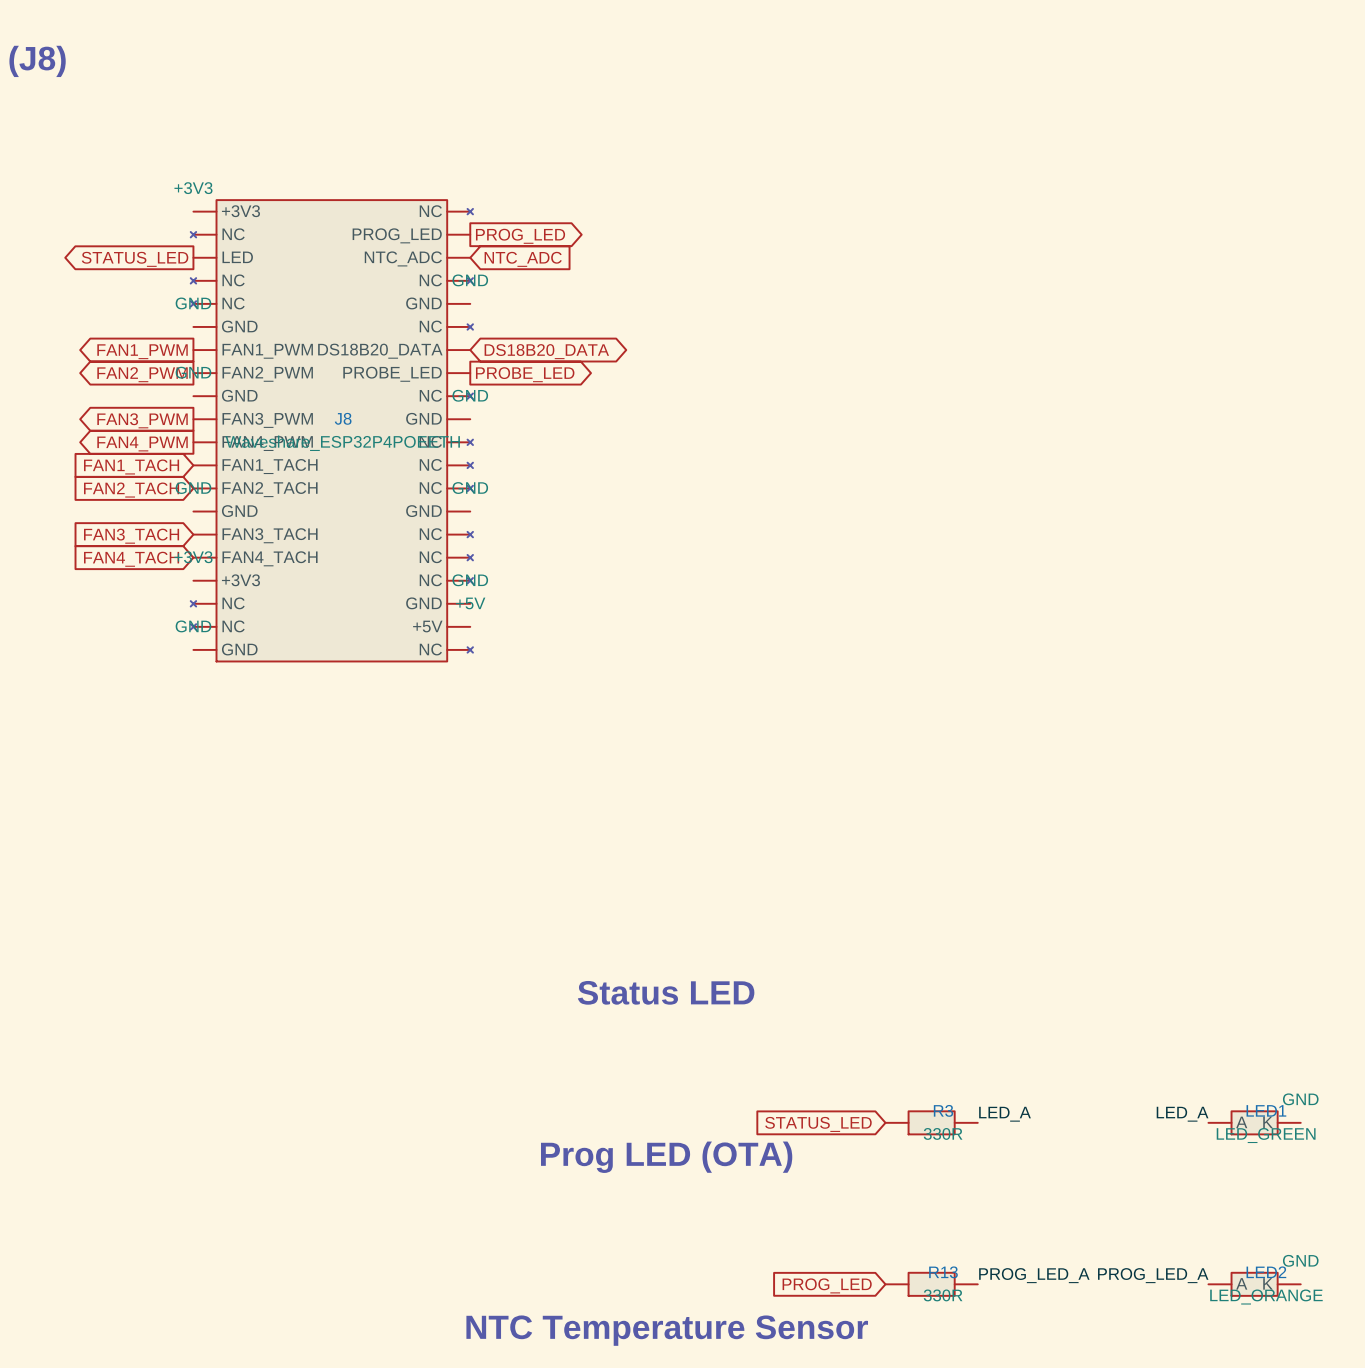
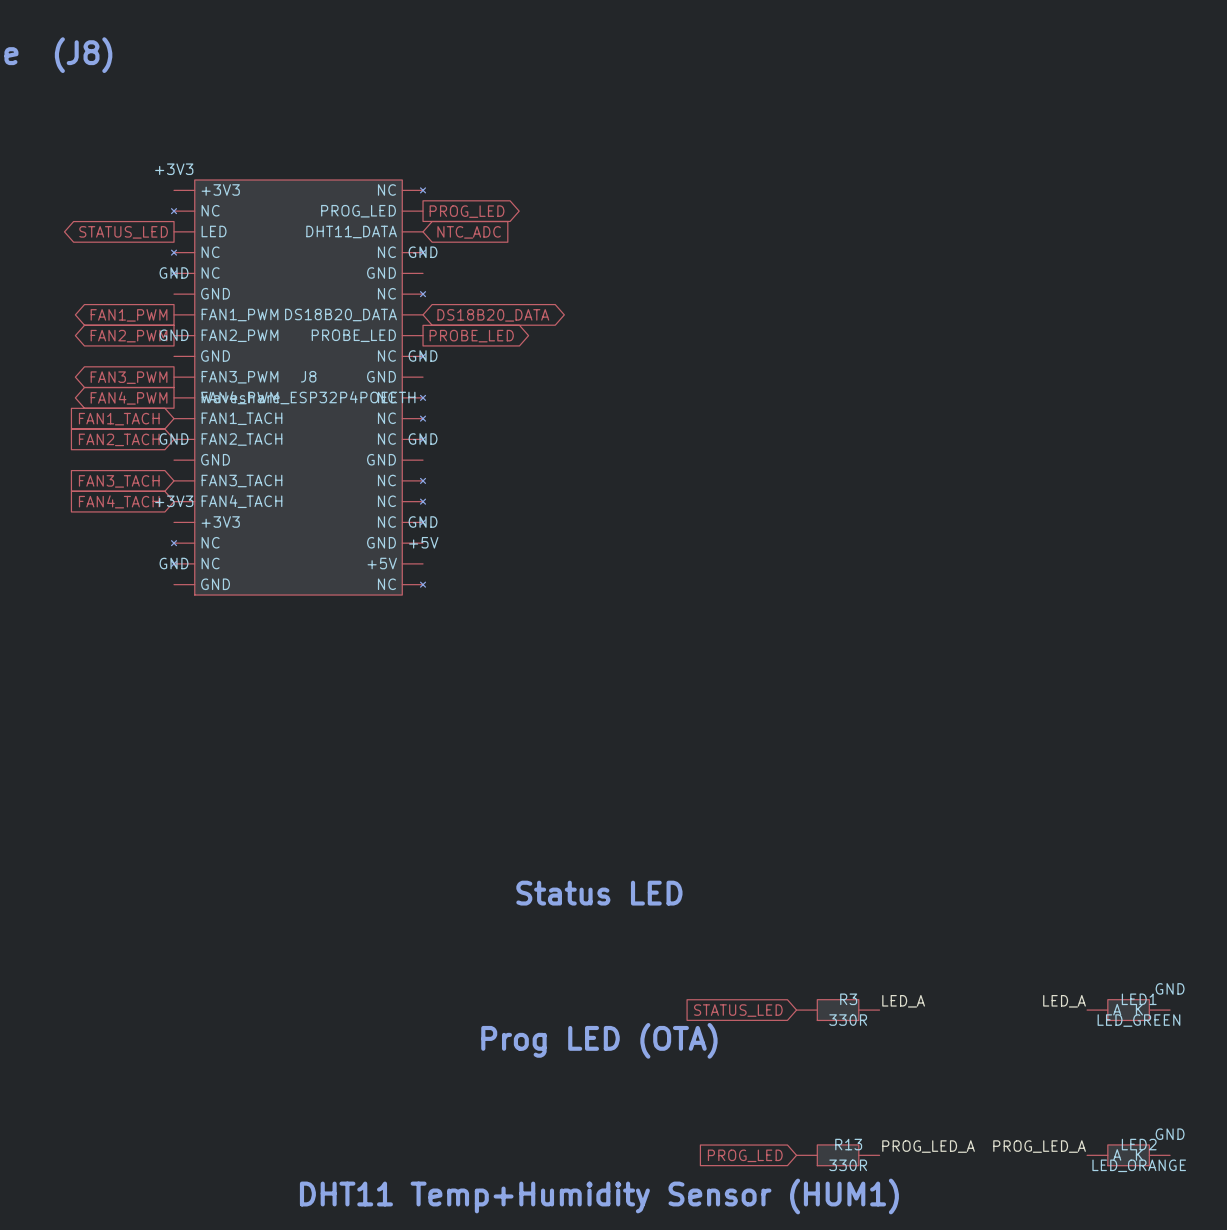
J8 pin name: NTC_ADC (403, 258) -> DHT11_DATA (351, 231)
text: NTC Temperature Sensor (667, 1330) -> DHT11 Temp+Humidity Sensor (HUM1) (599, 1196)

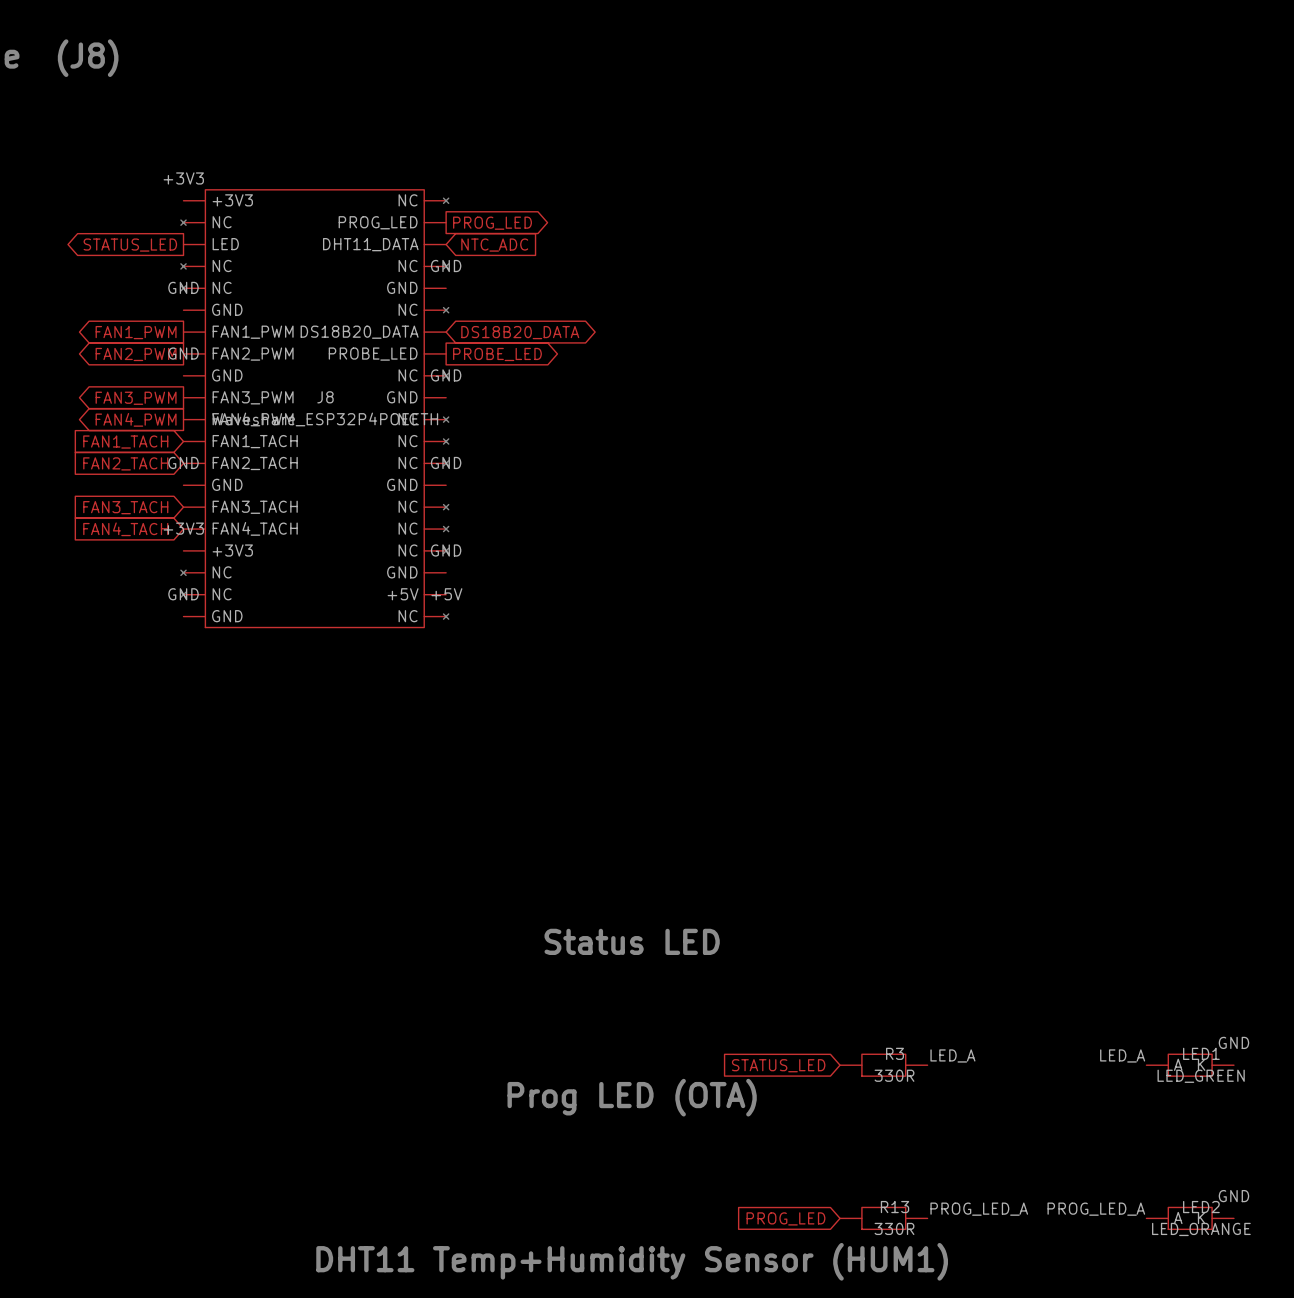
power symbol position: +5V (423, 542) -> +5V (446, 594)

